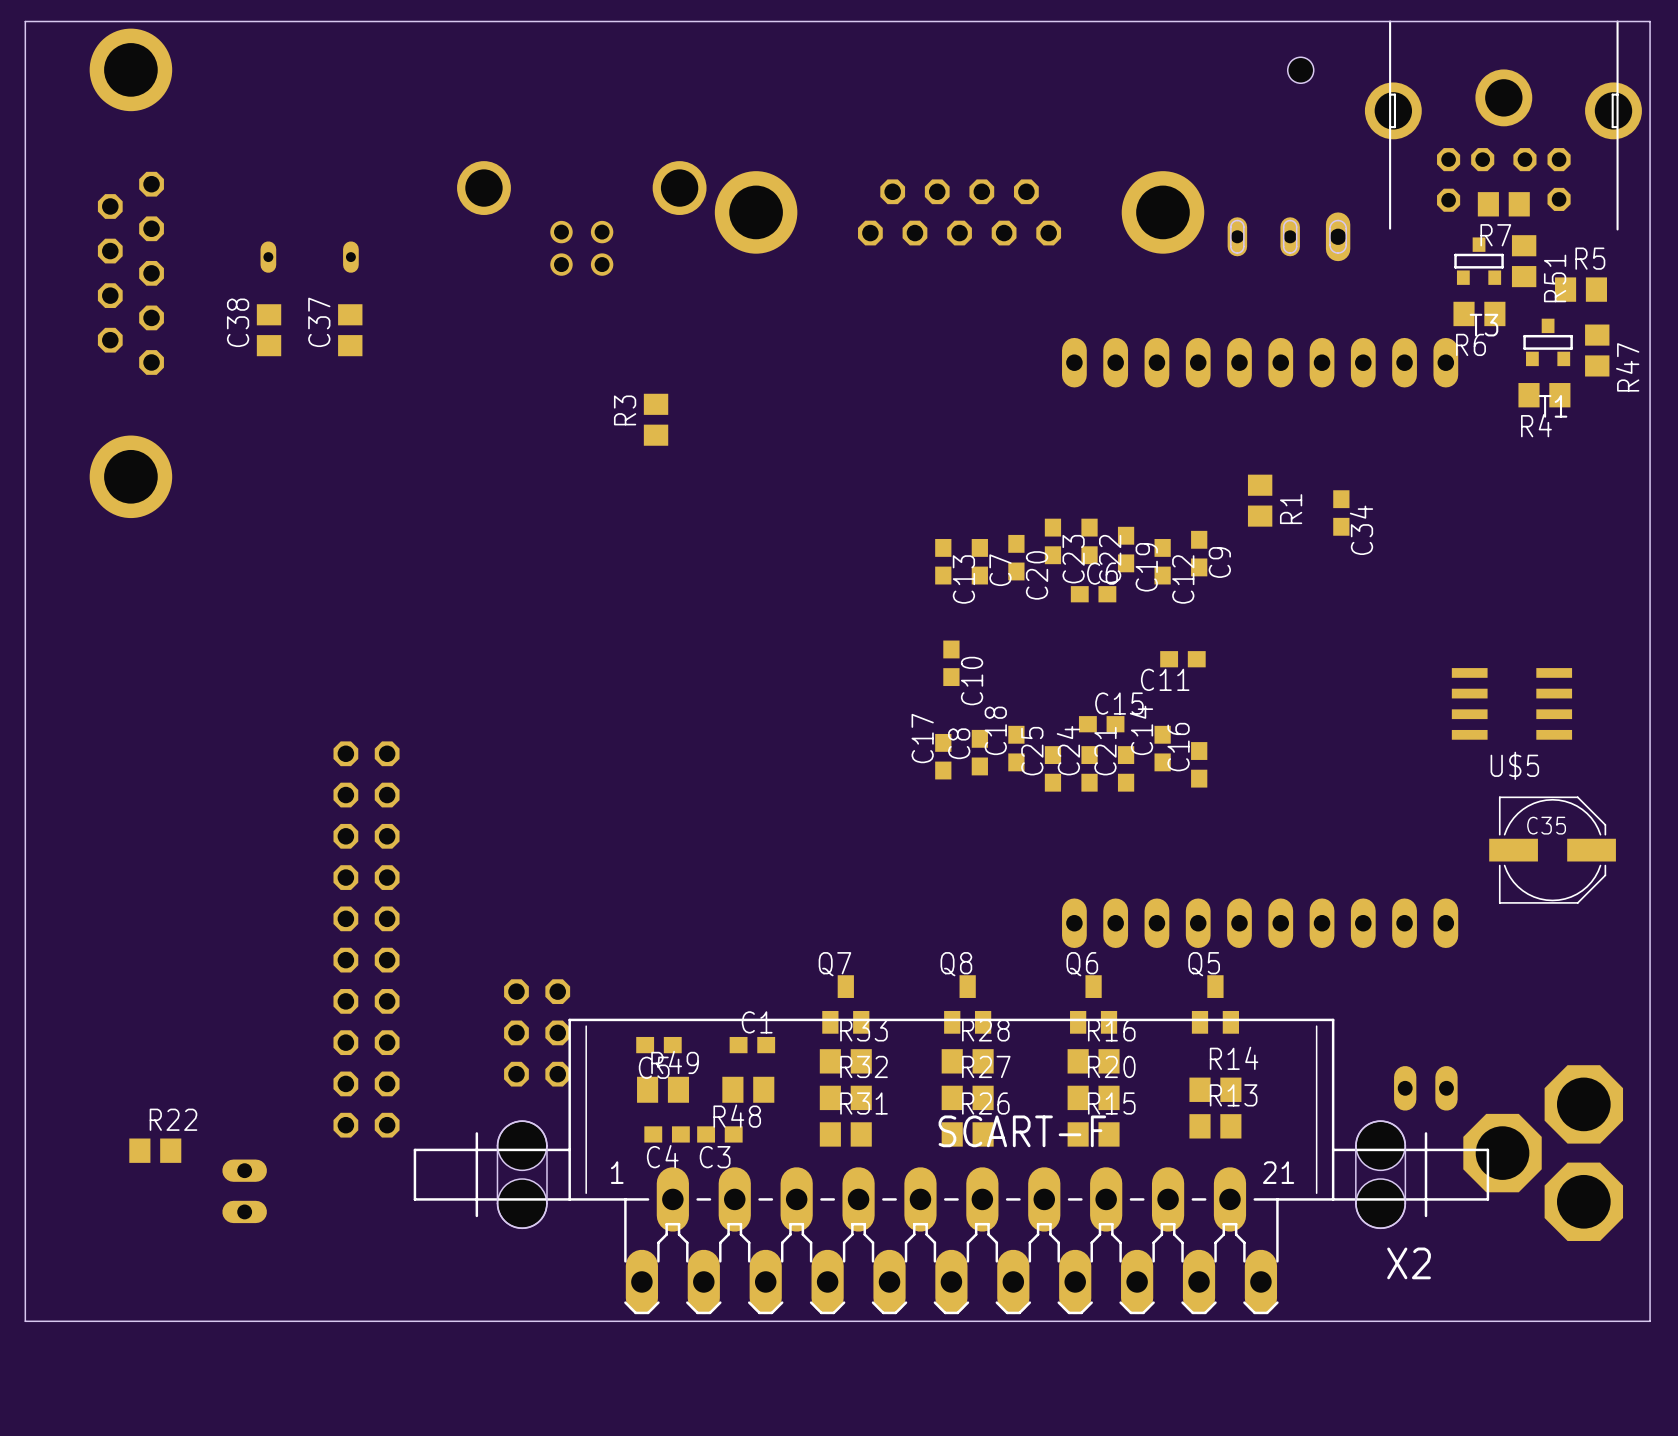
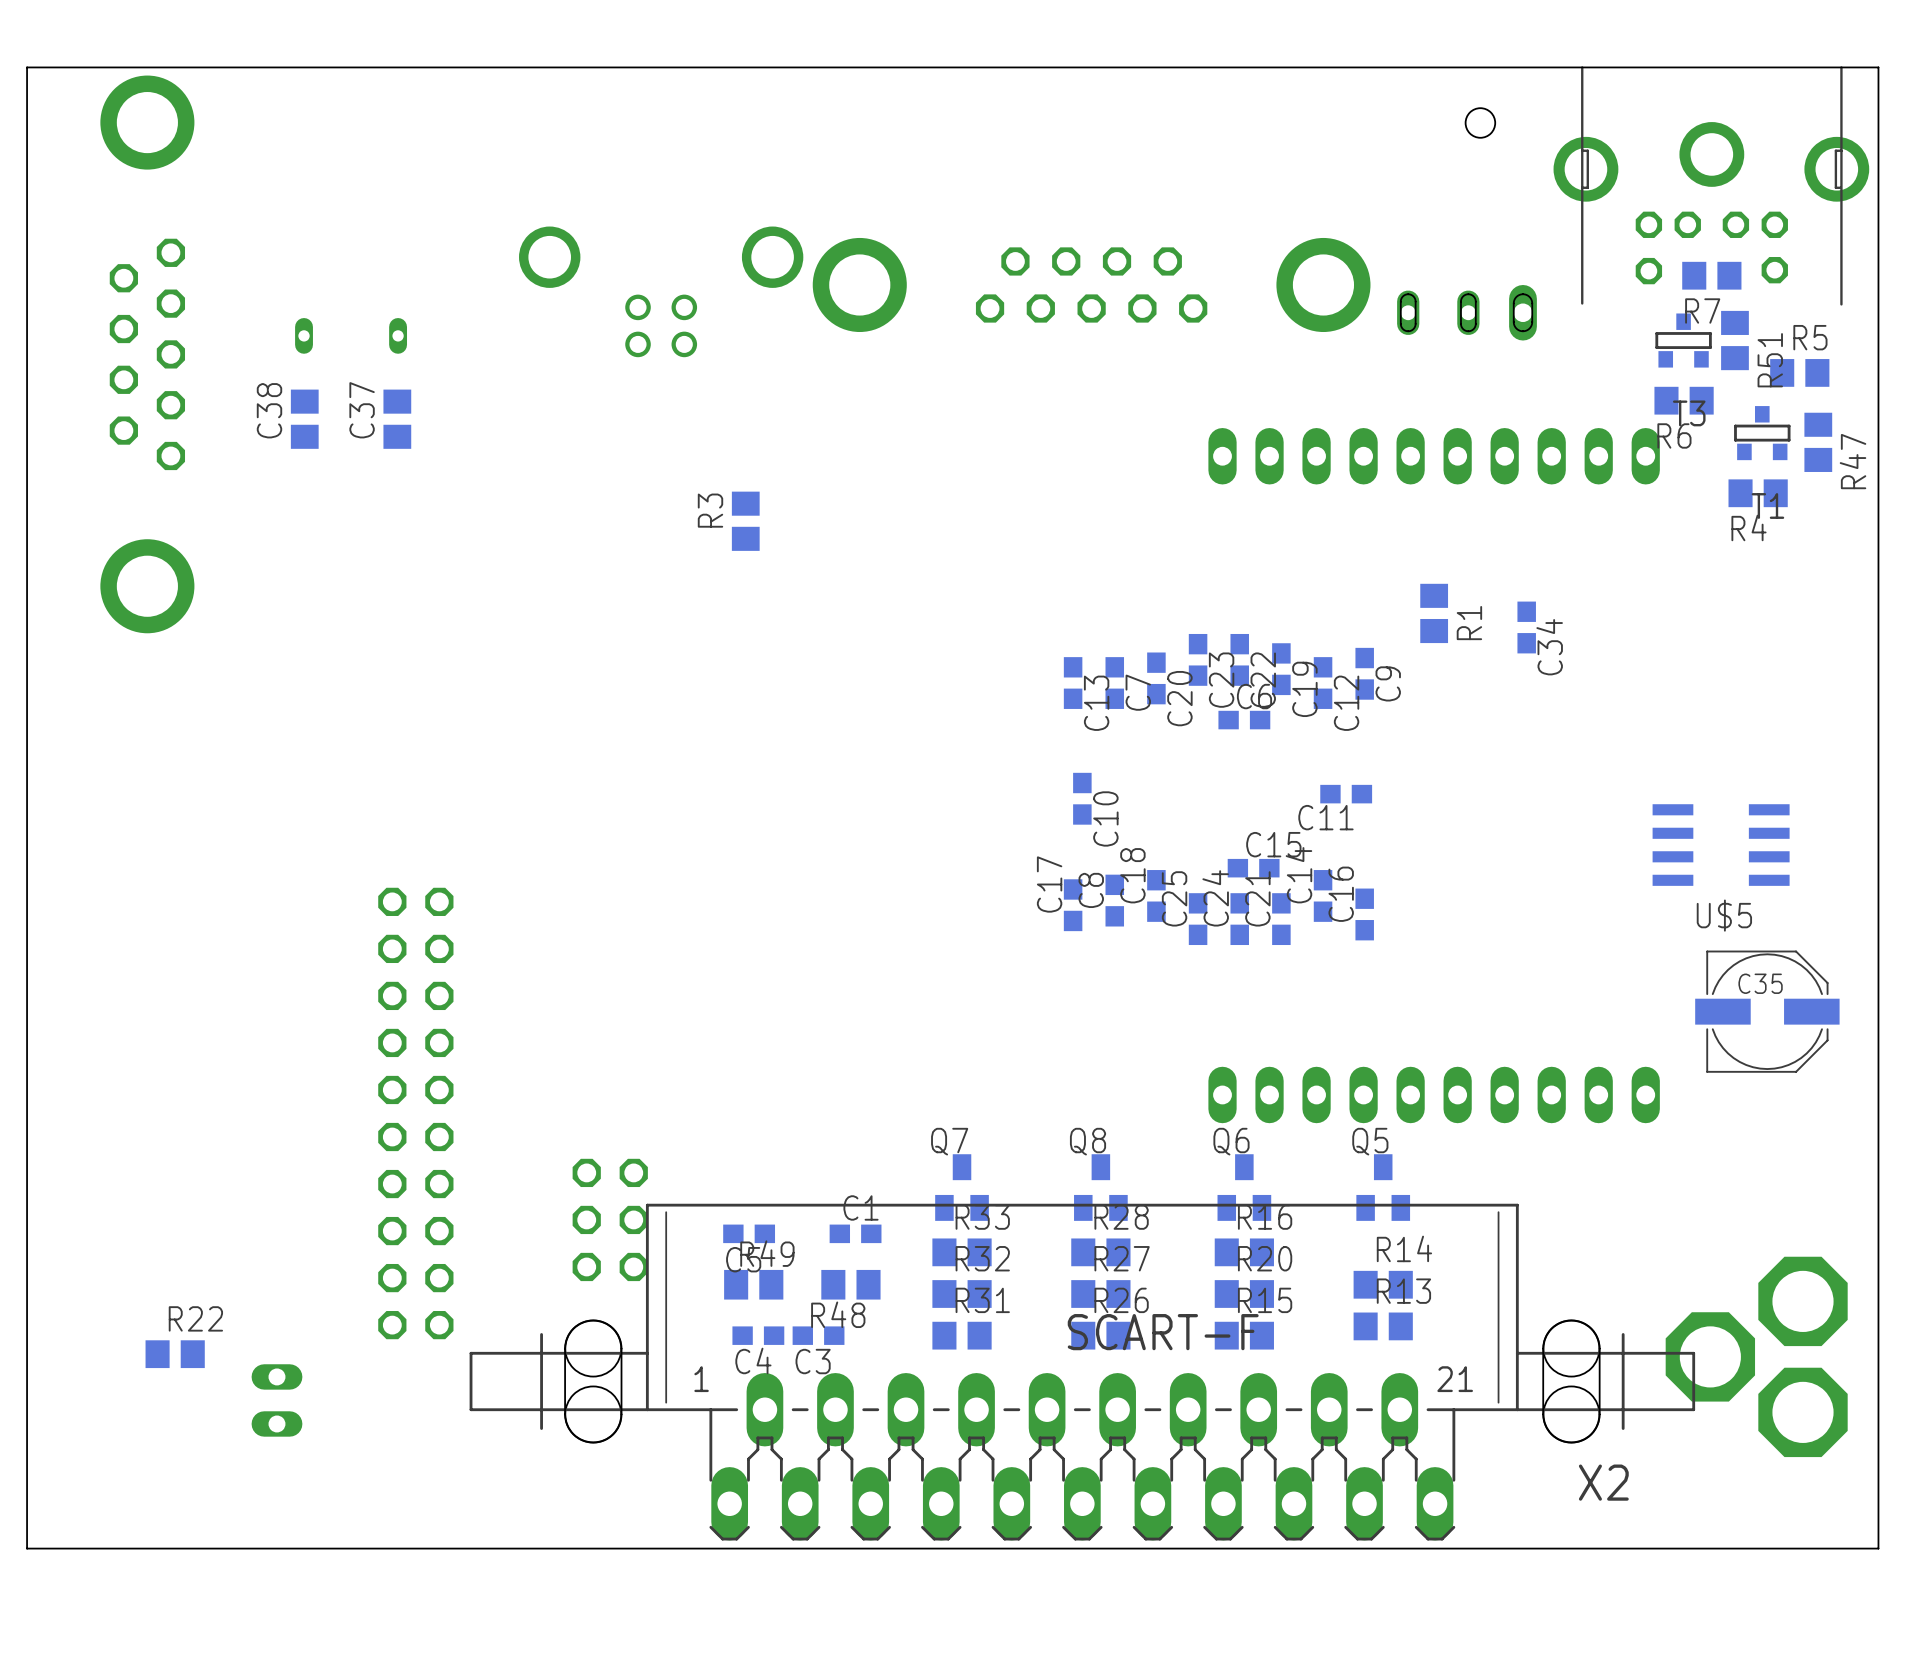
part: (1425, 1088) -> none

